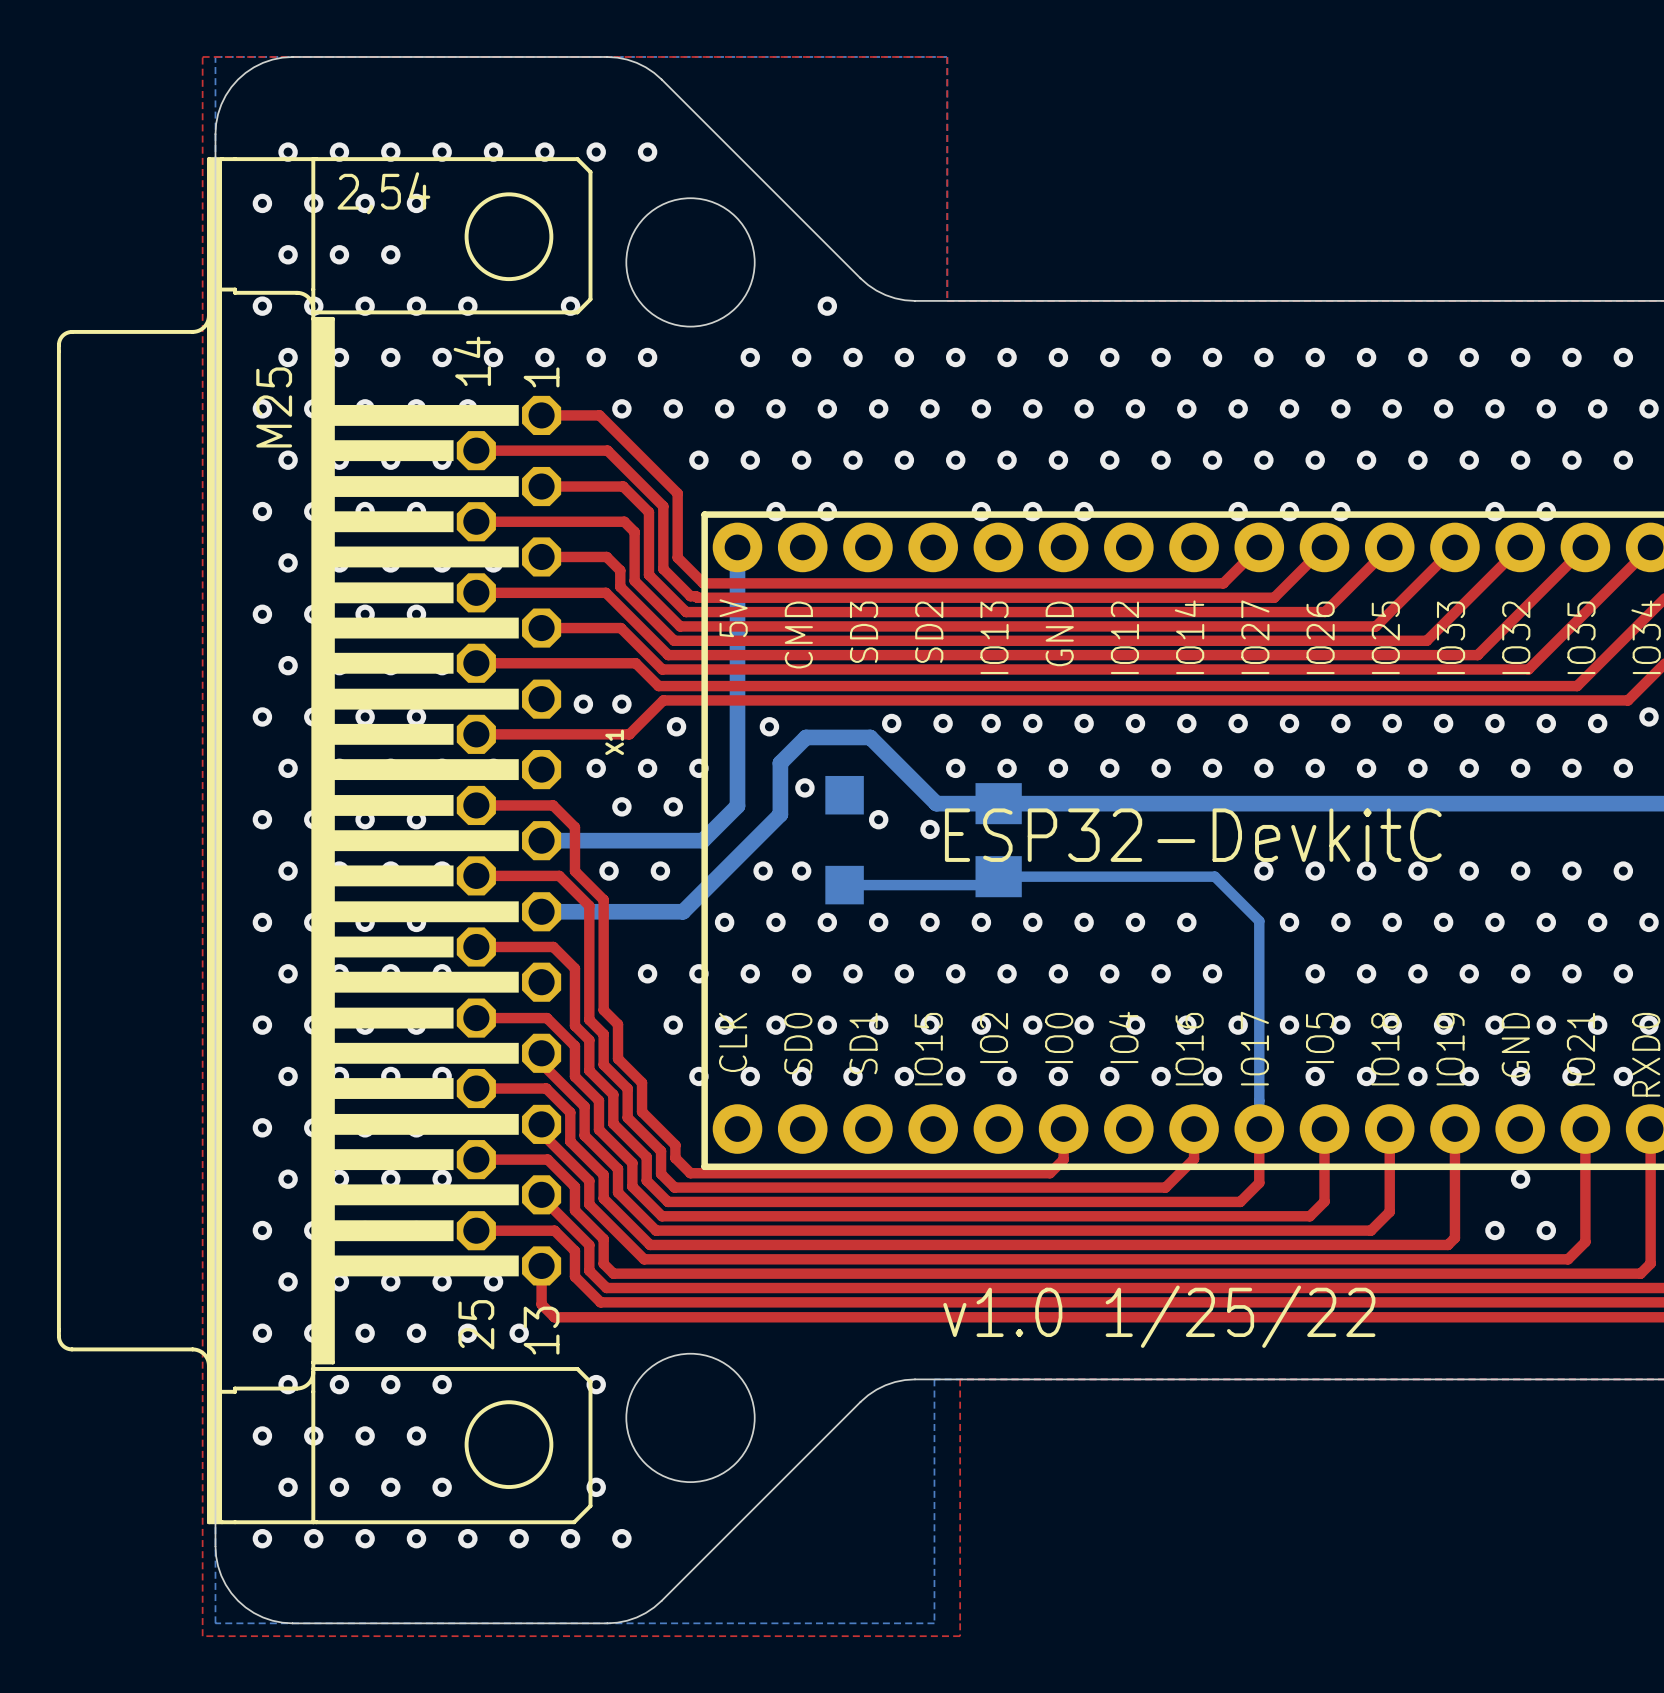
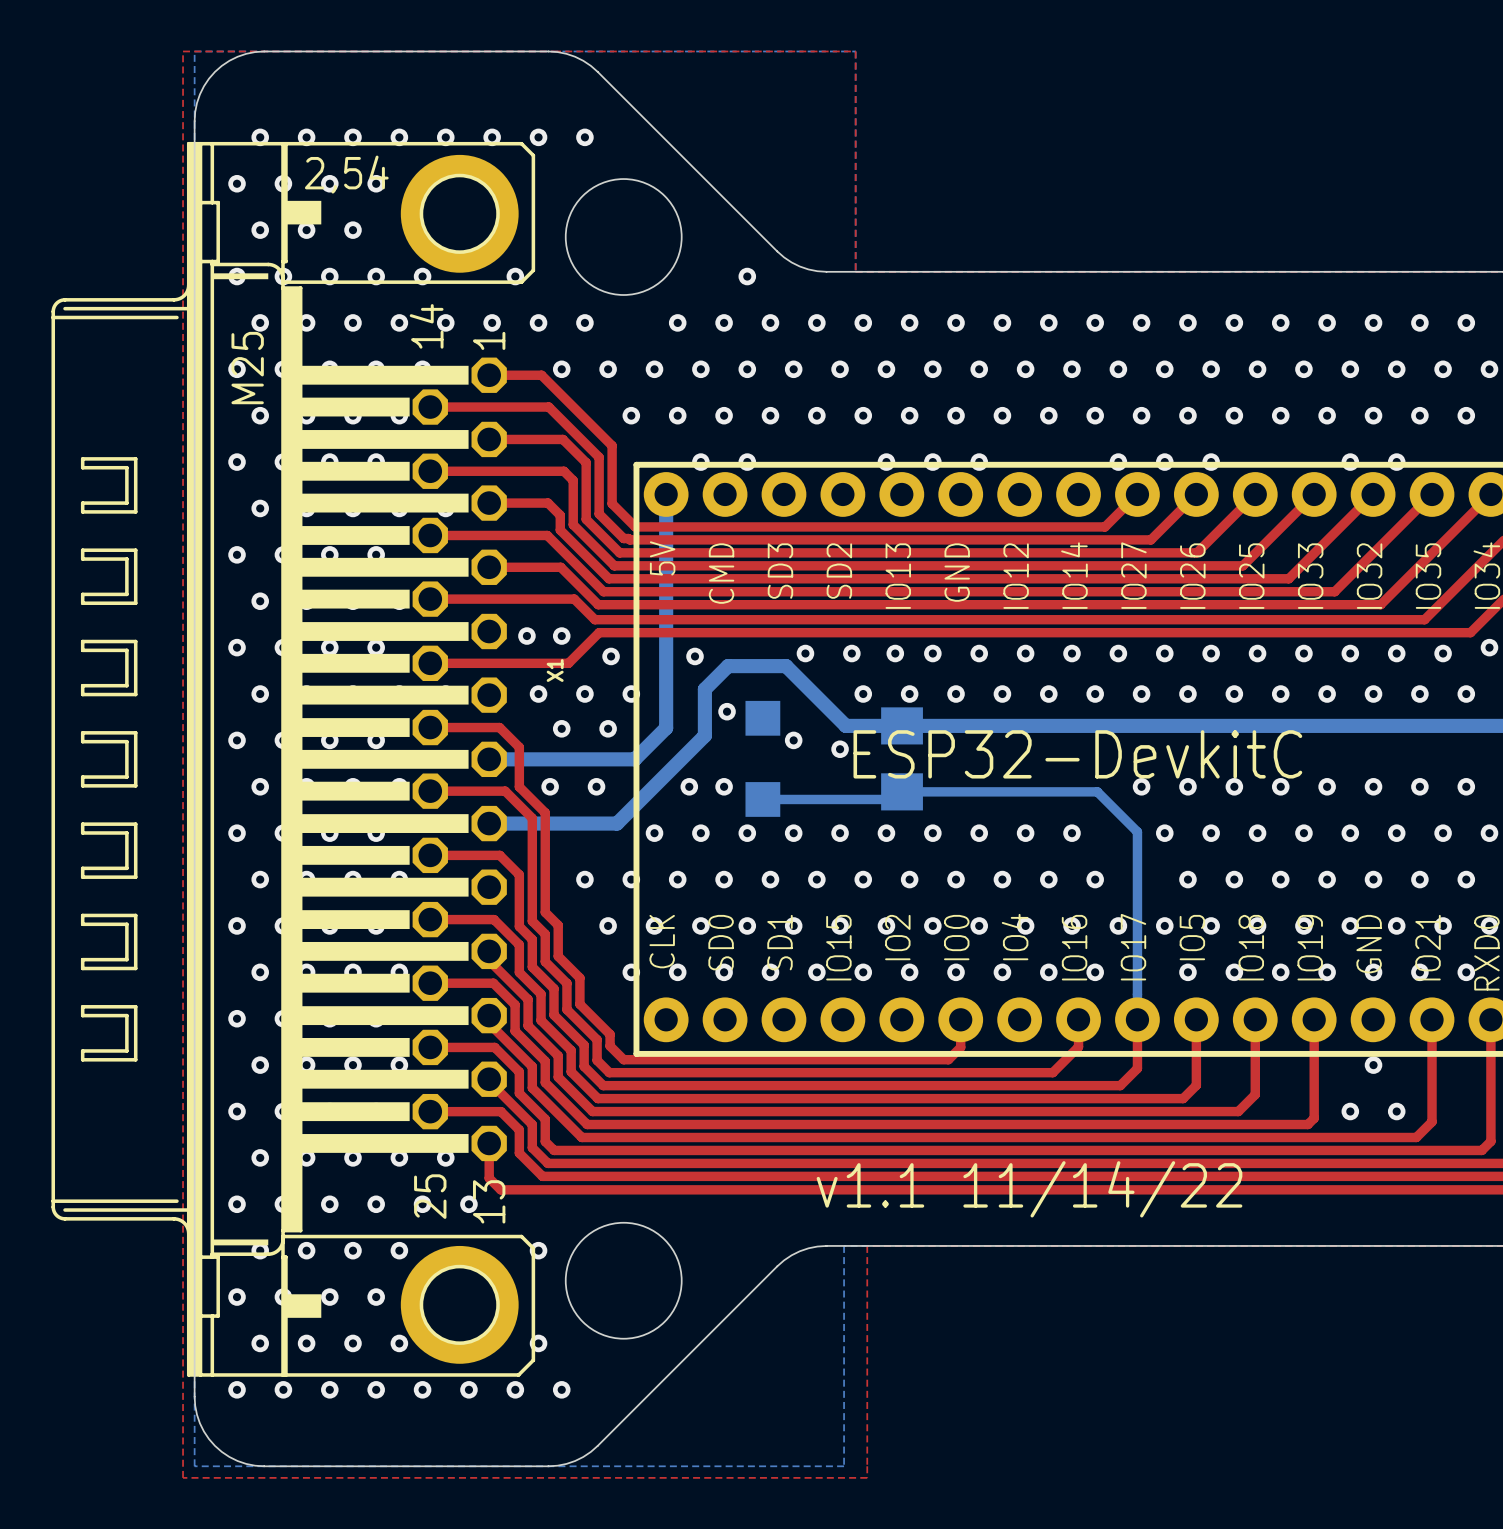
X1 footprint: [56, 157, 593, 1525] -> [51, 141, 536, 1377]
text: v1.0 1/25/22 (1159, 1316) -> v1.1 11/14/22 (1029, 1189)

